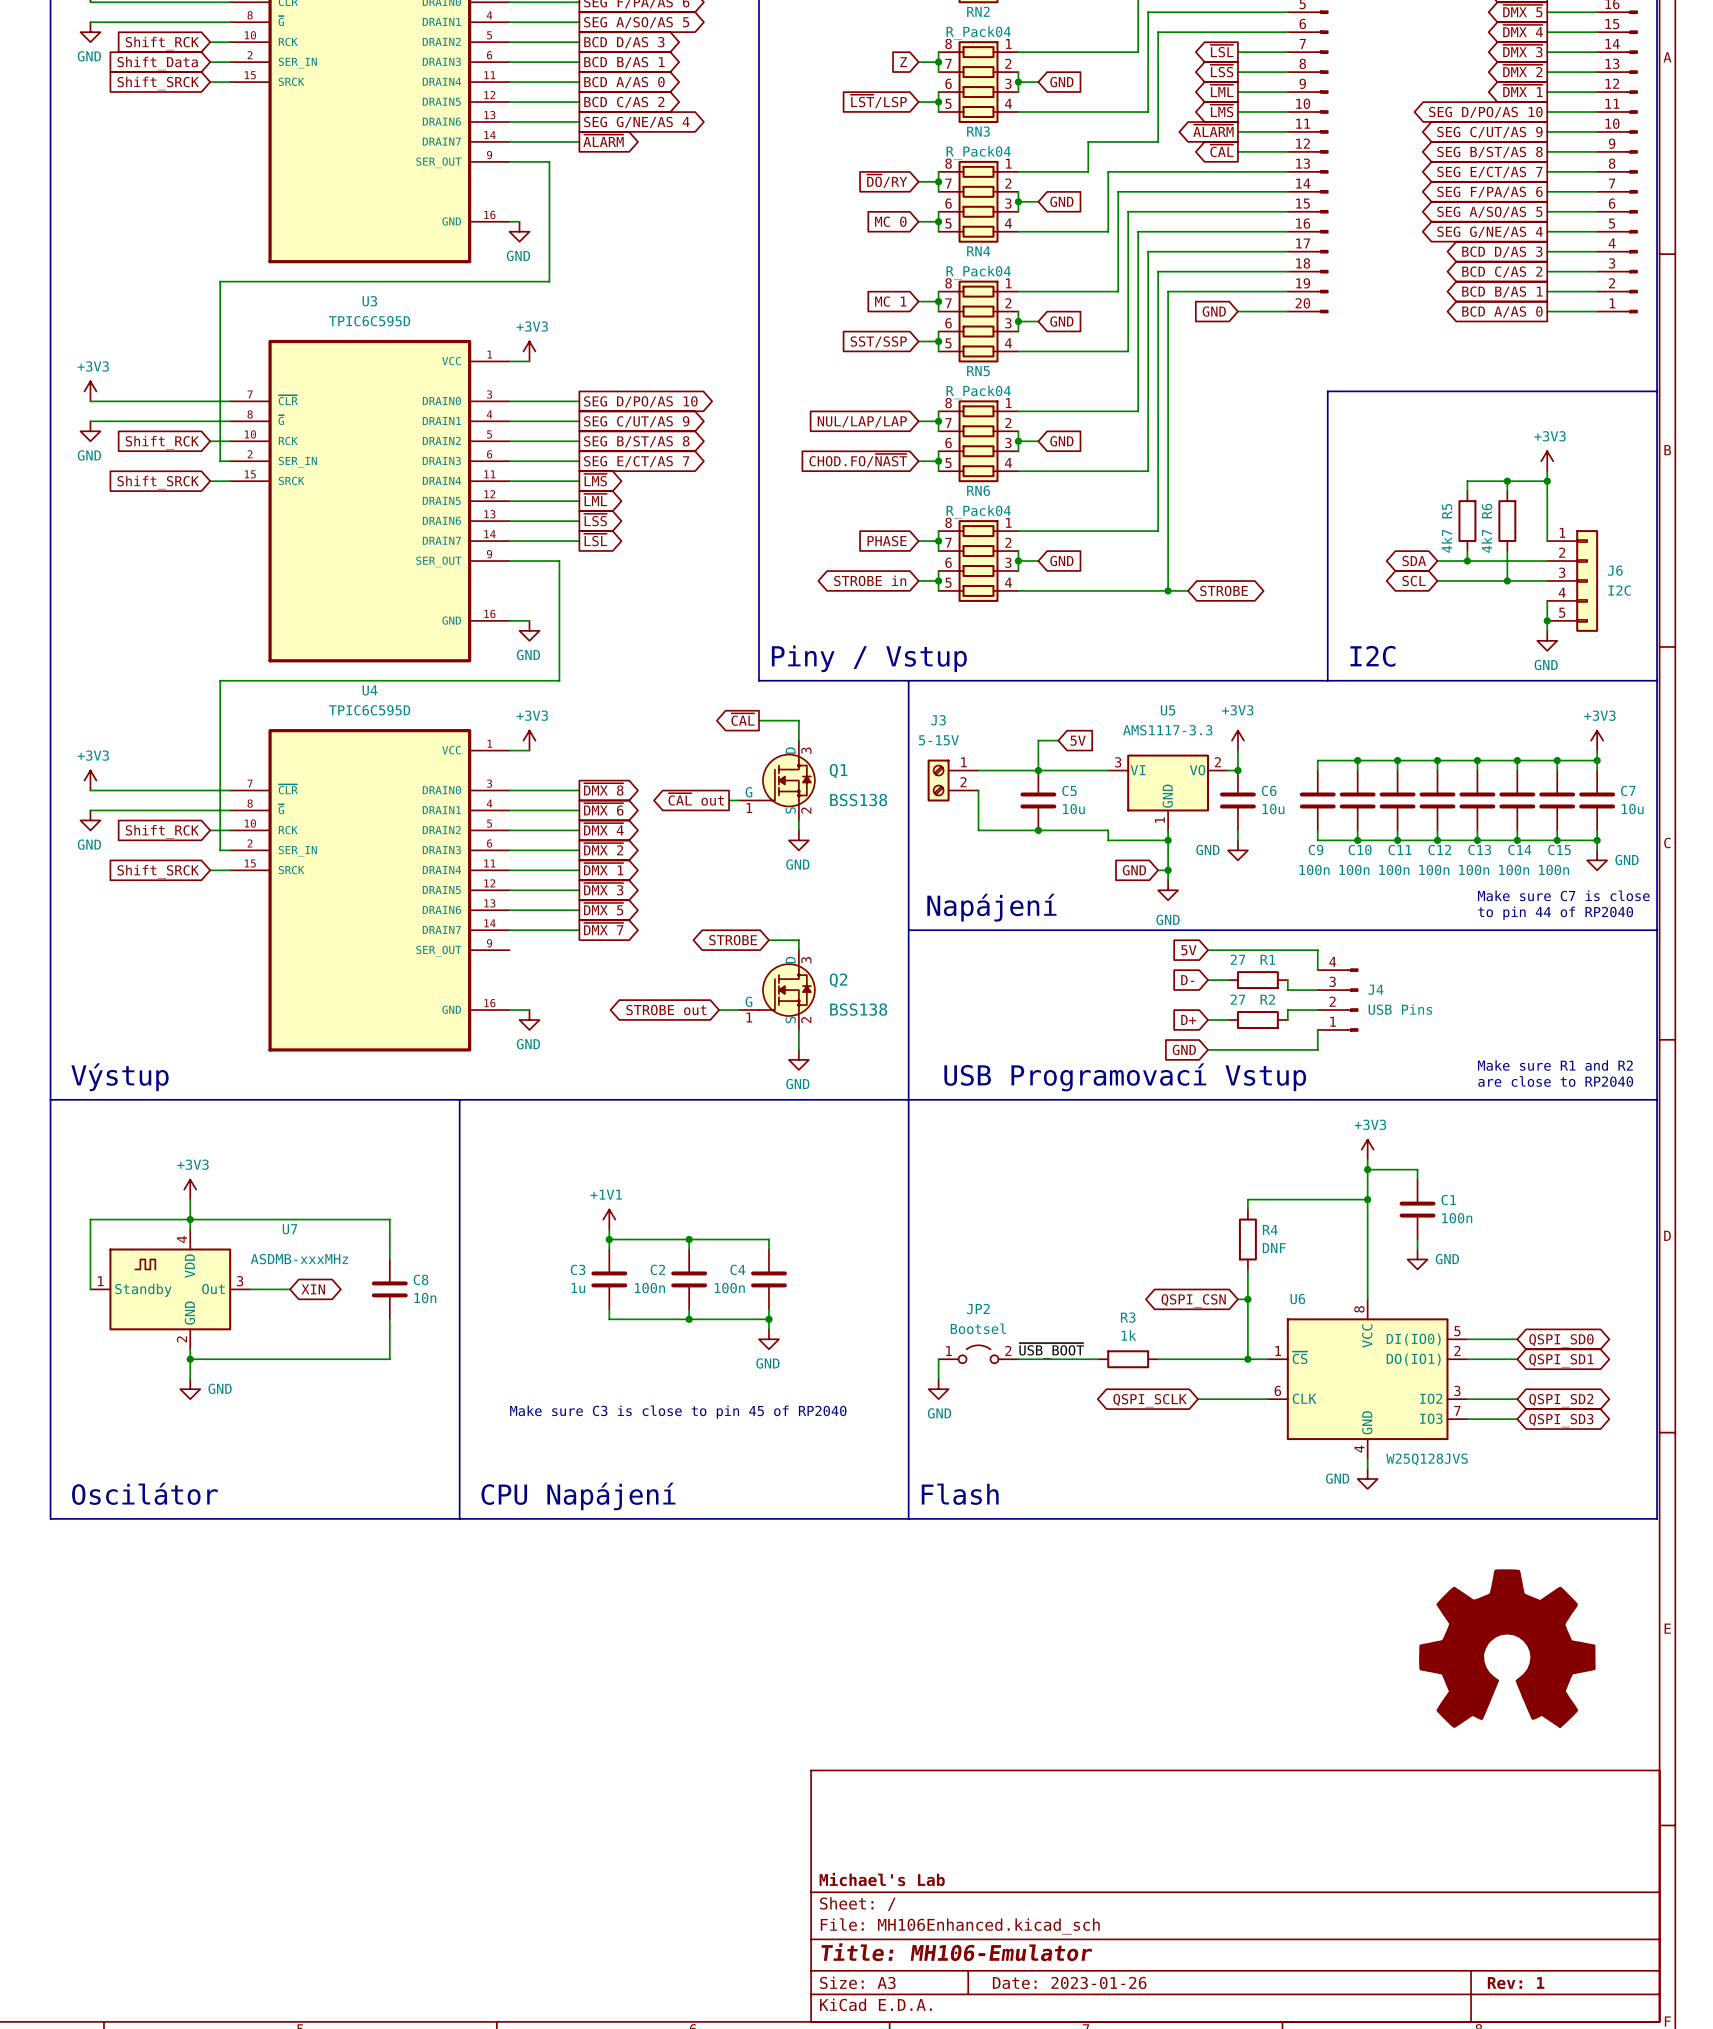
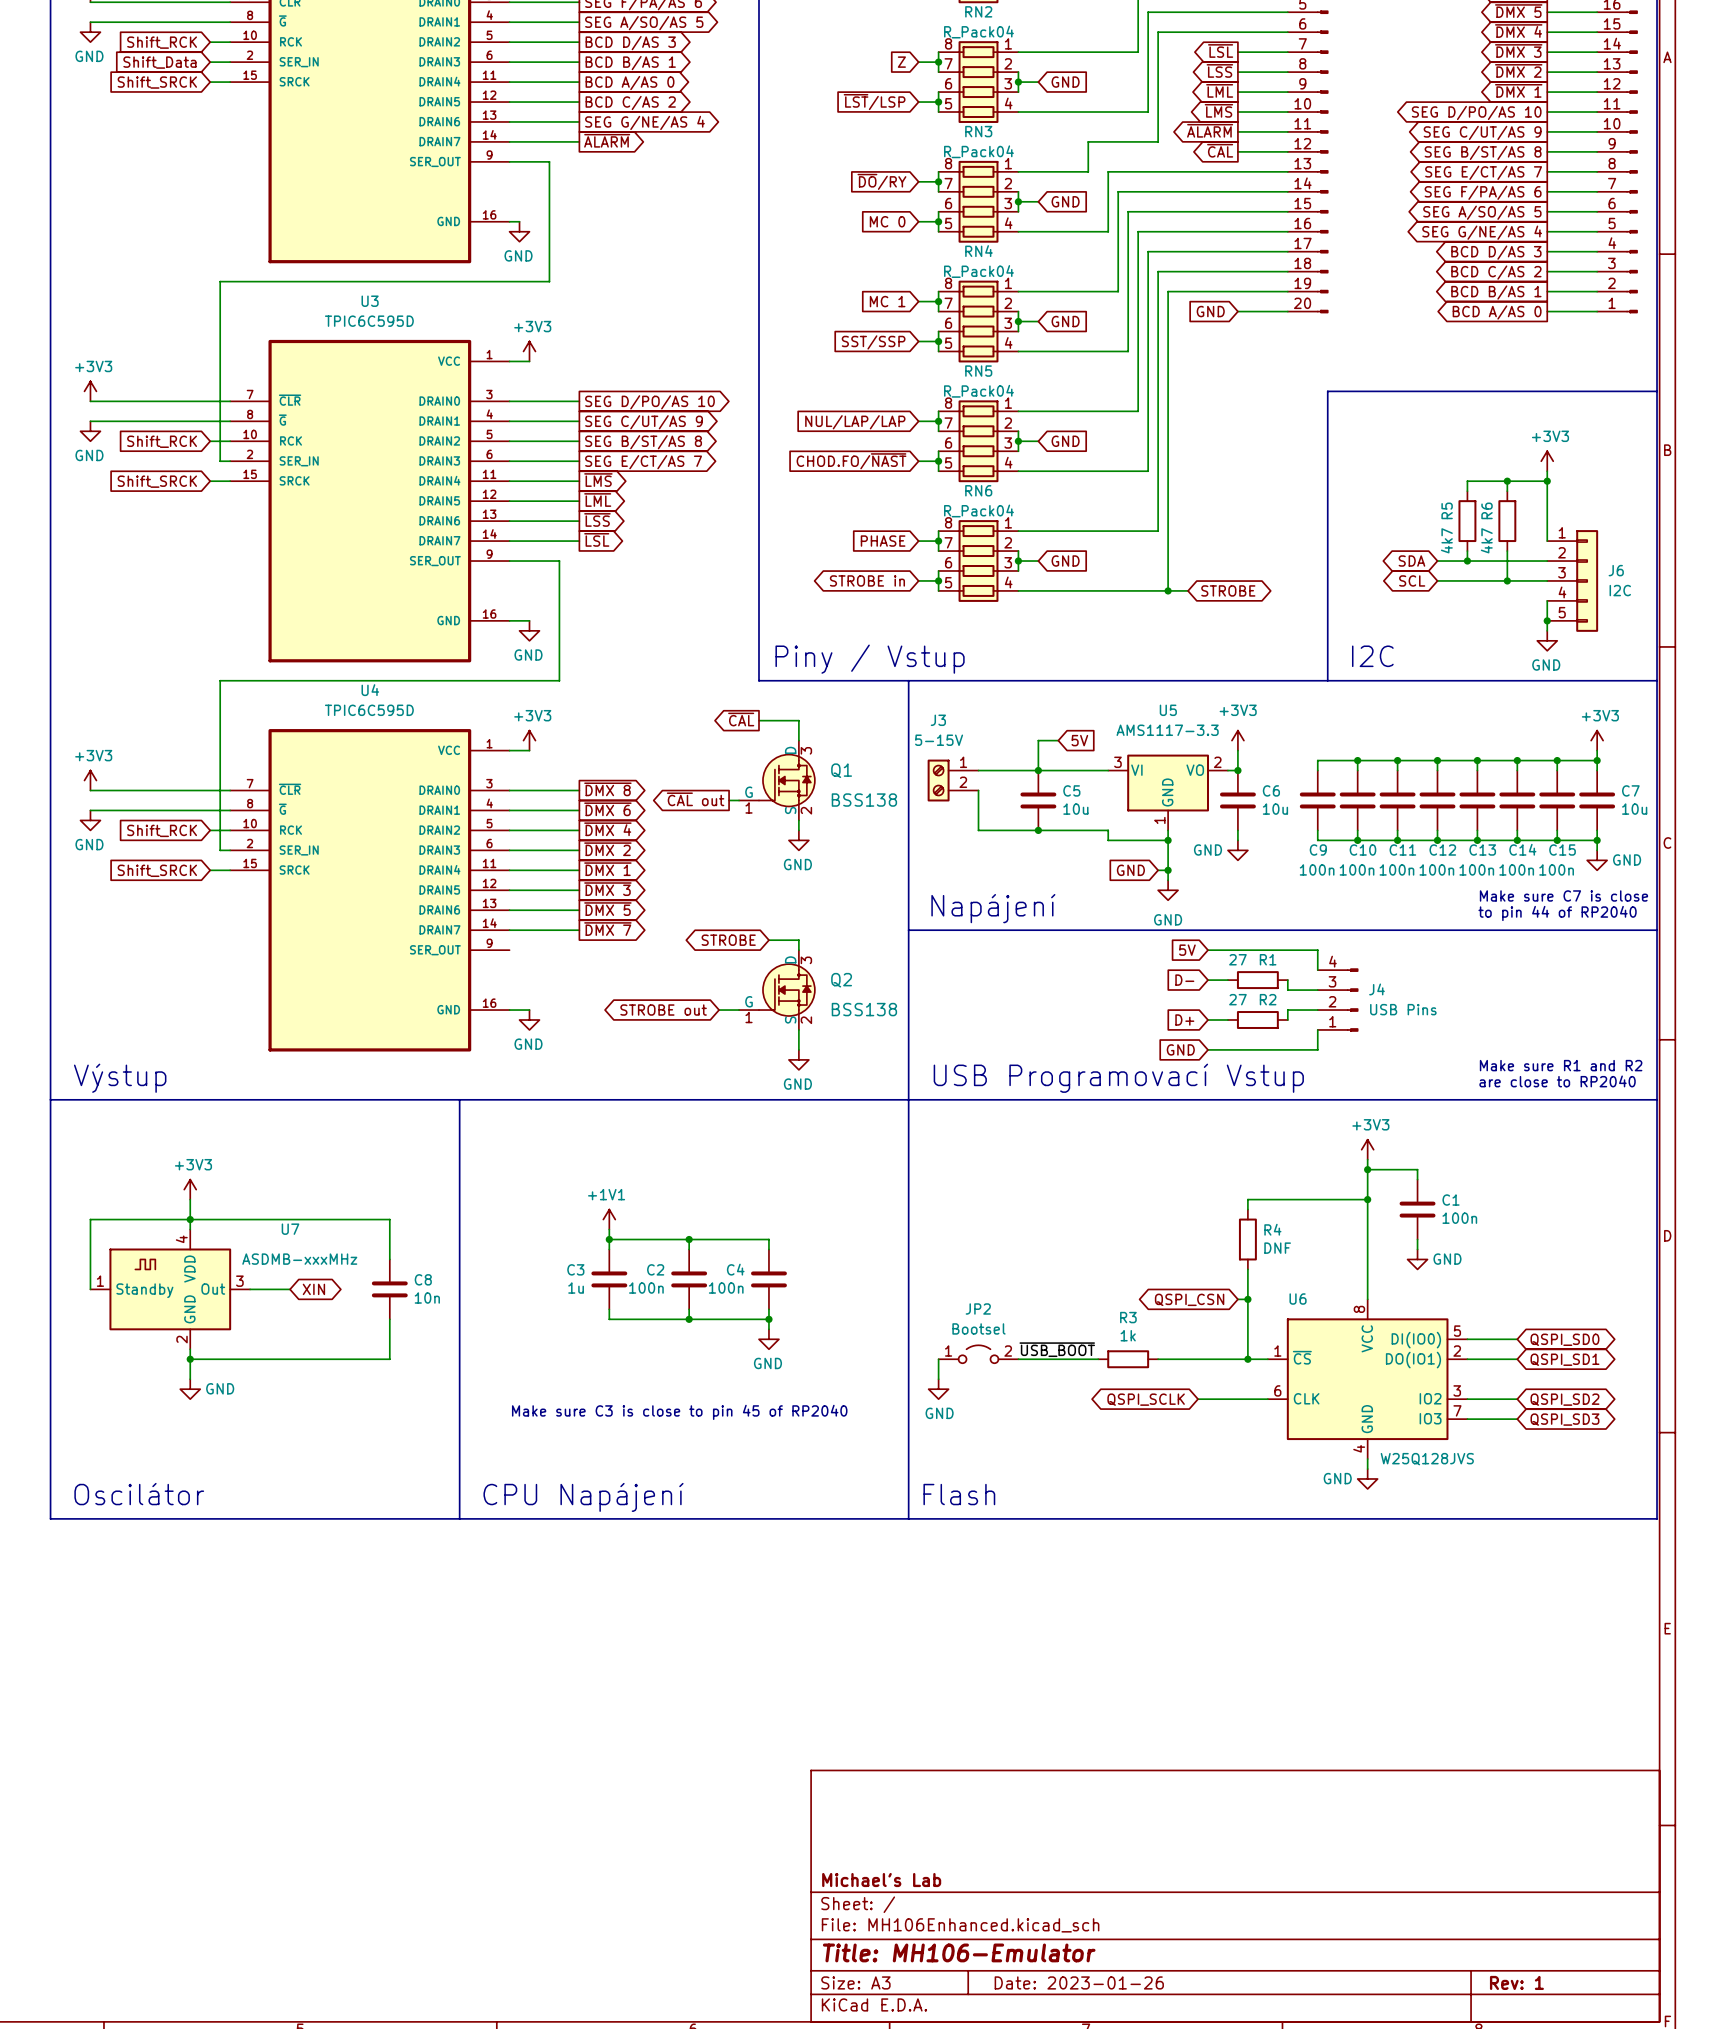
power symbol: (1507, 1648) -> none

